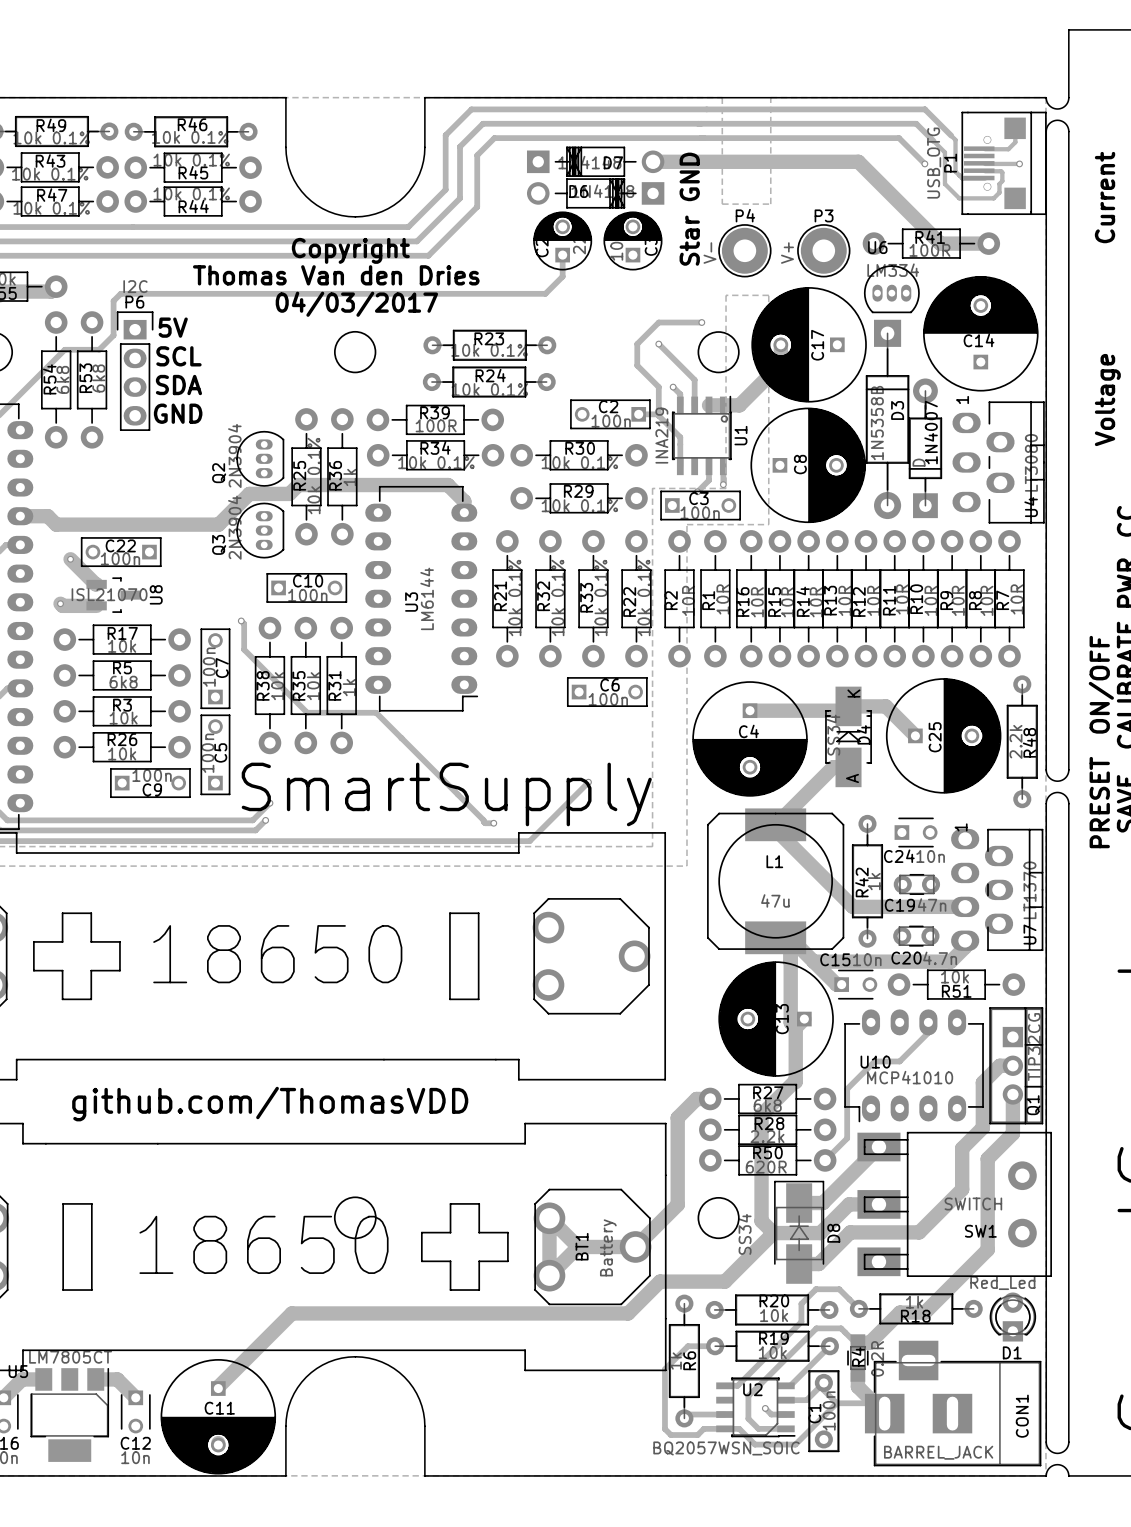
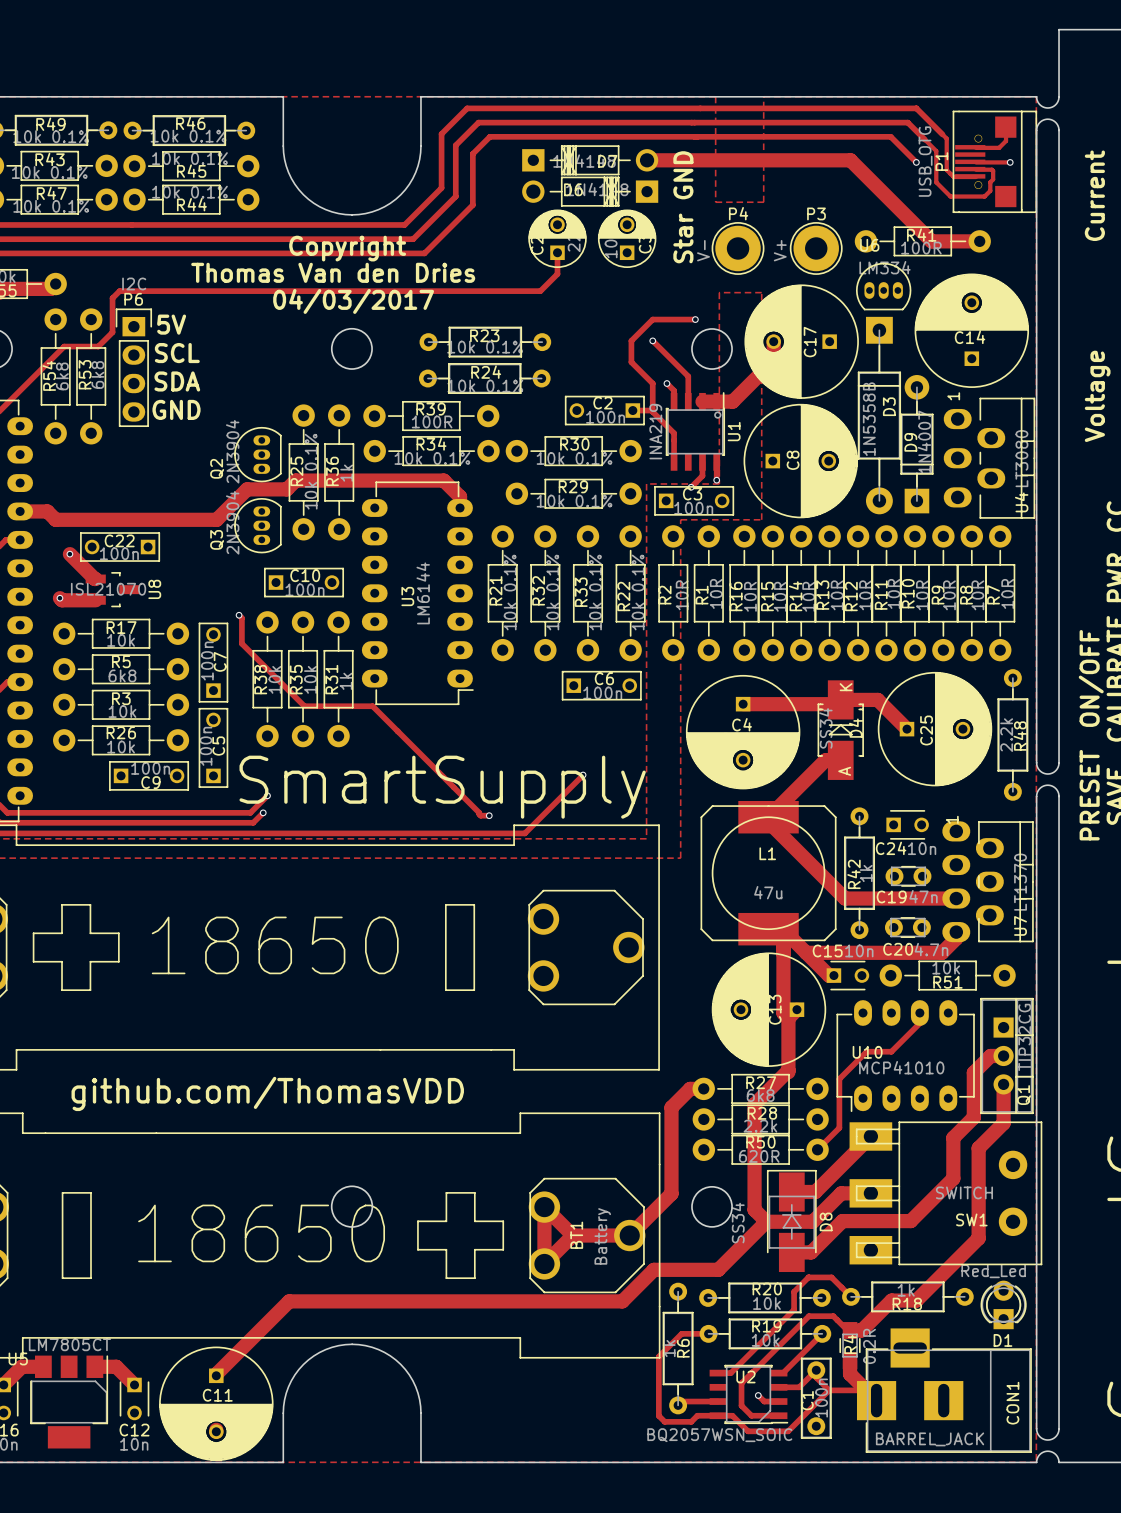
1N4007 name: 1N4007 (931, 432) -> D9 (910, 442)
1N4007 value: D (919, 462) -> 1N4007 (924, 442)

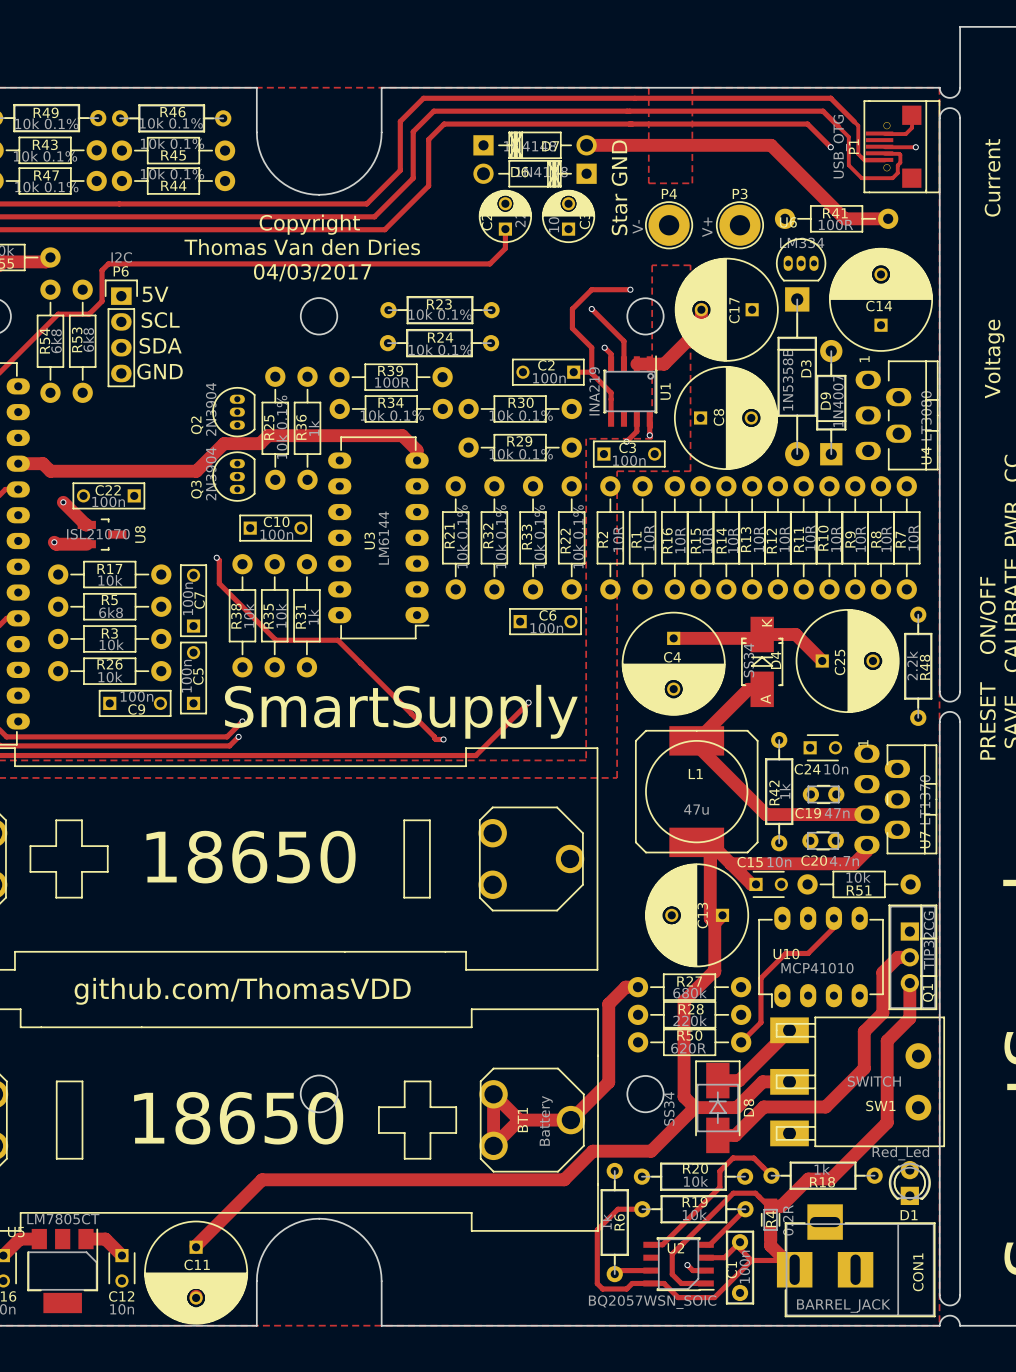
R27 value: 6k8 (760, 1095) -> 680k (690, 993)
R28 value: 2.2k (760, 1126) -> 220k (690, 1020)

